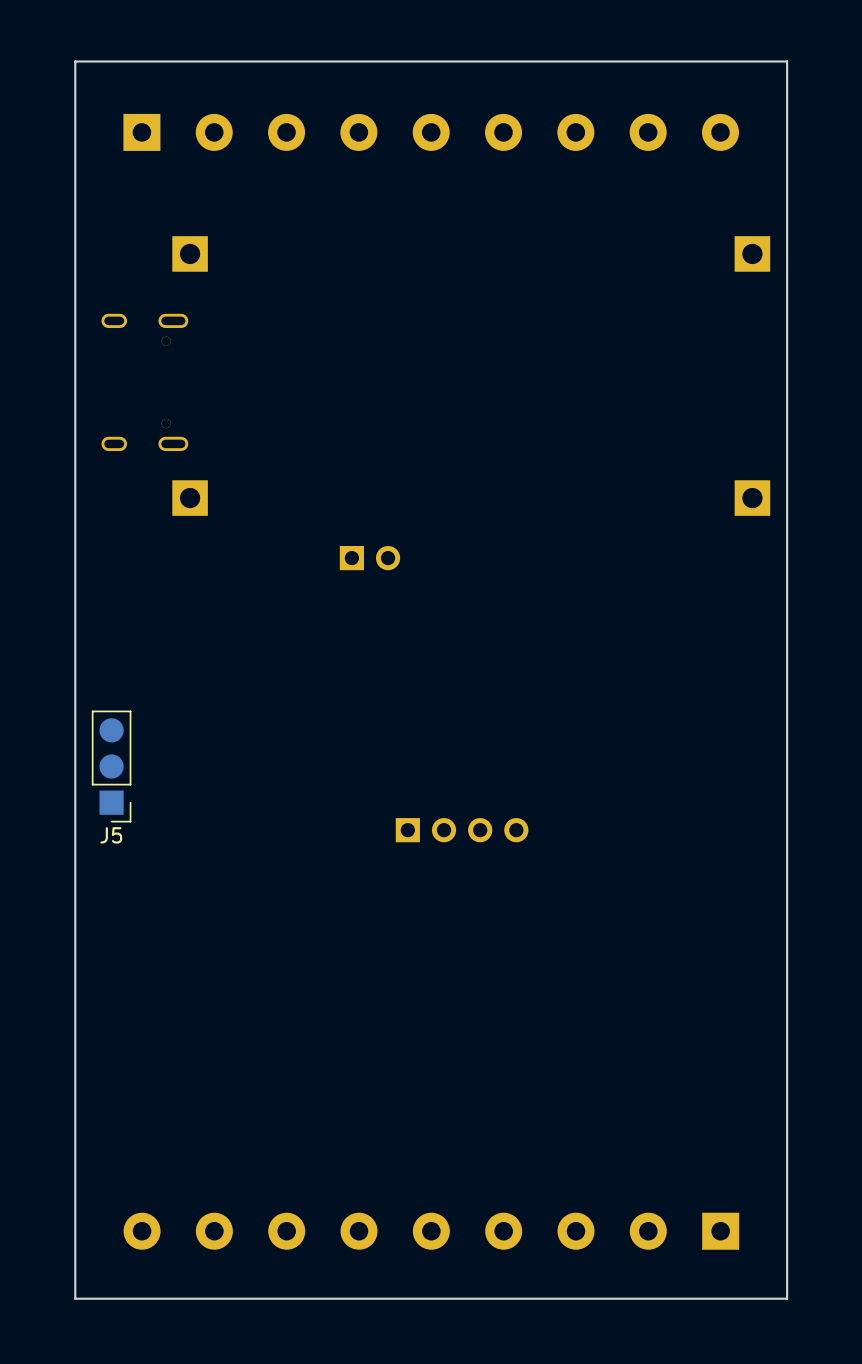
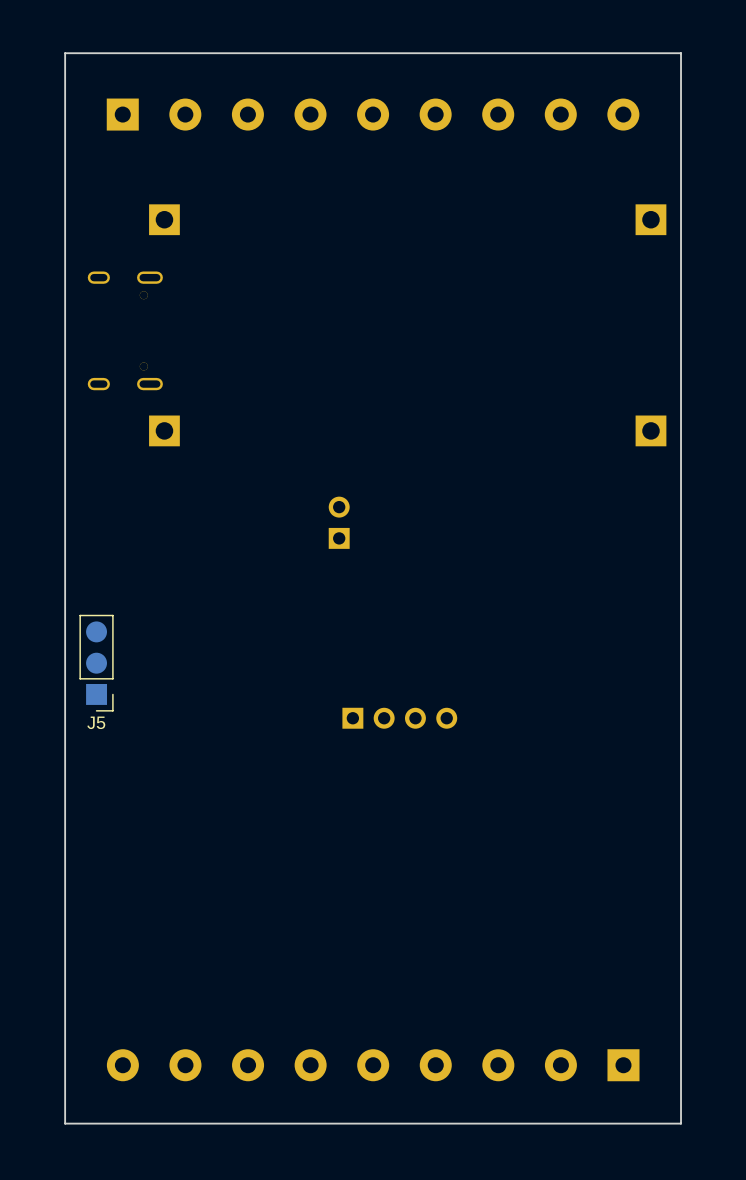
part rotation: 0° (369, 558) -> 90° counterclockwise (339, 522)
part position: (369, 558) -> (339, 522)

